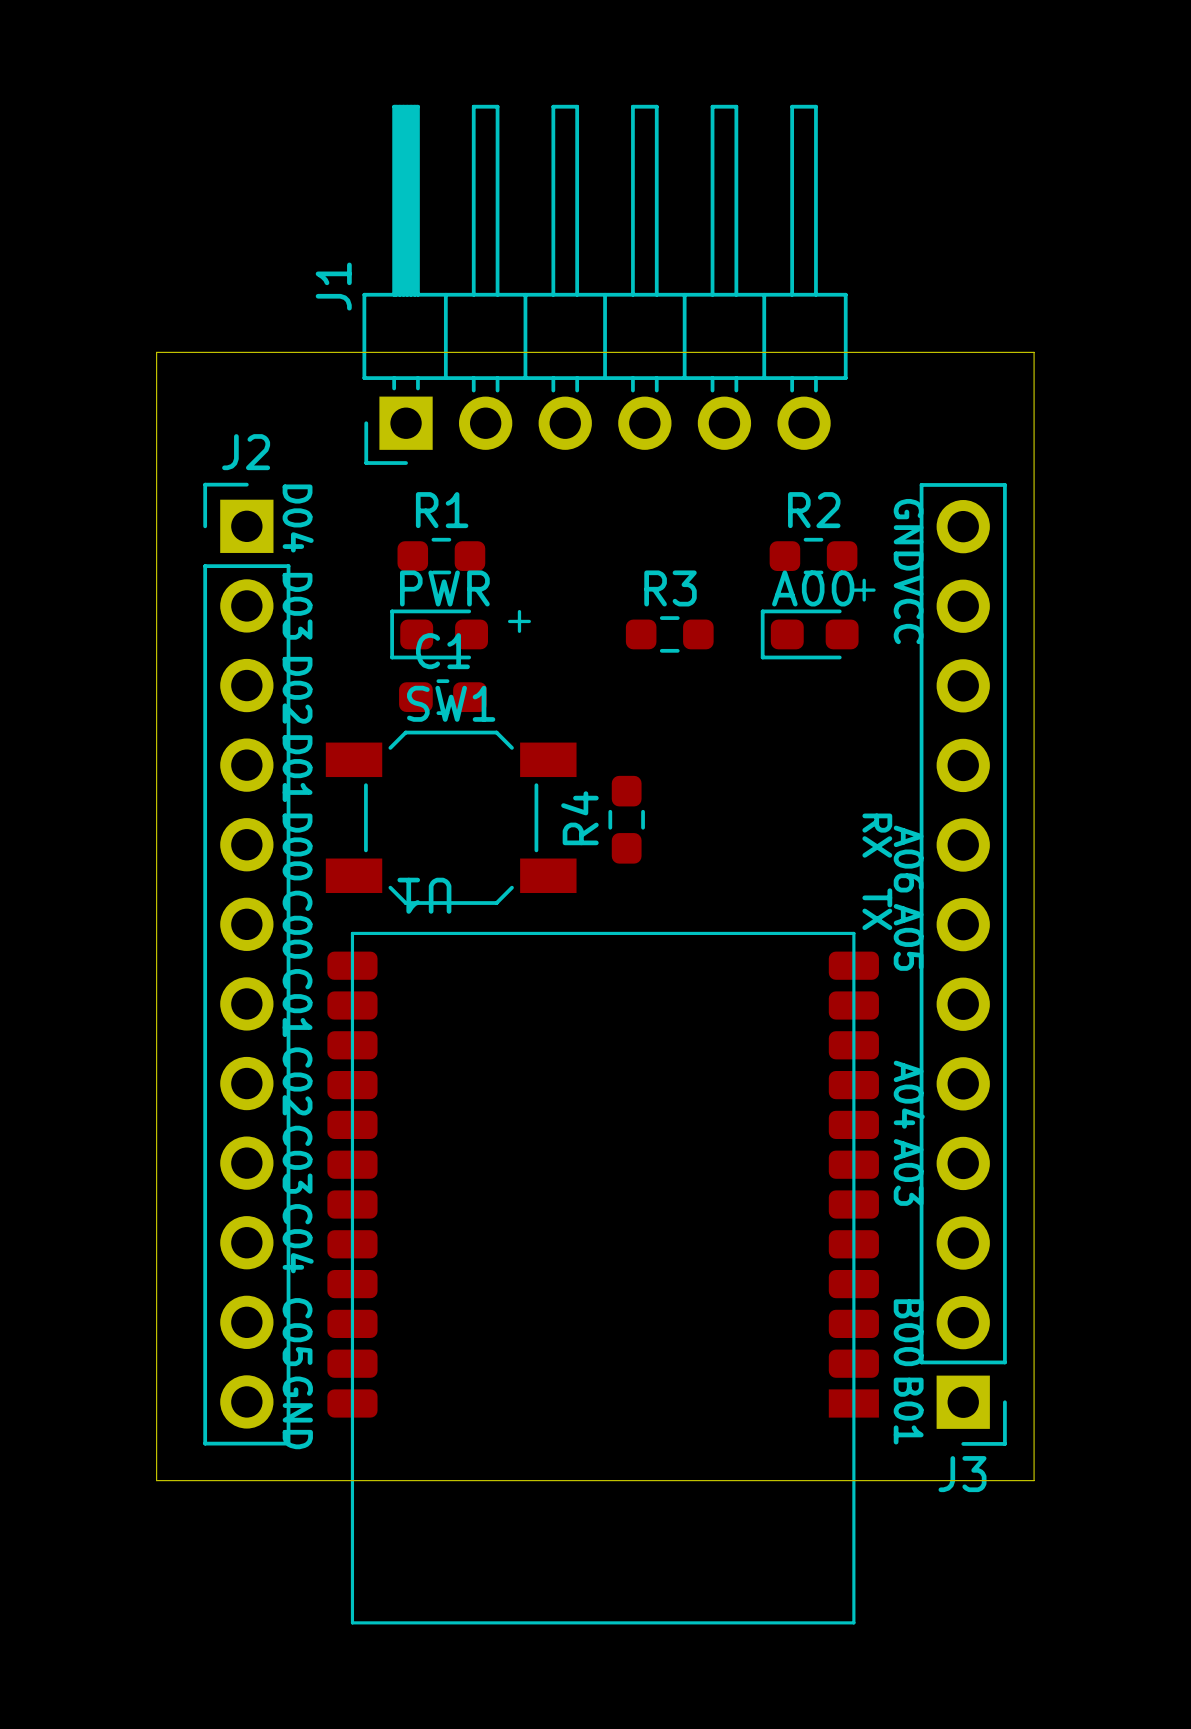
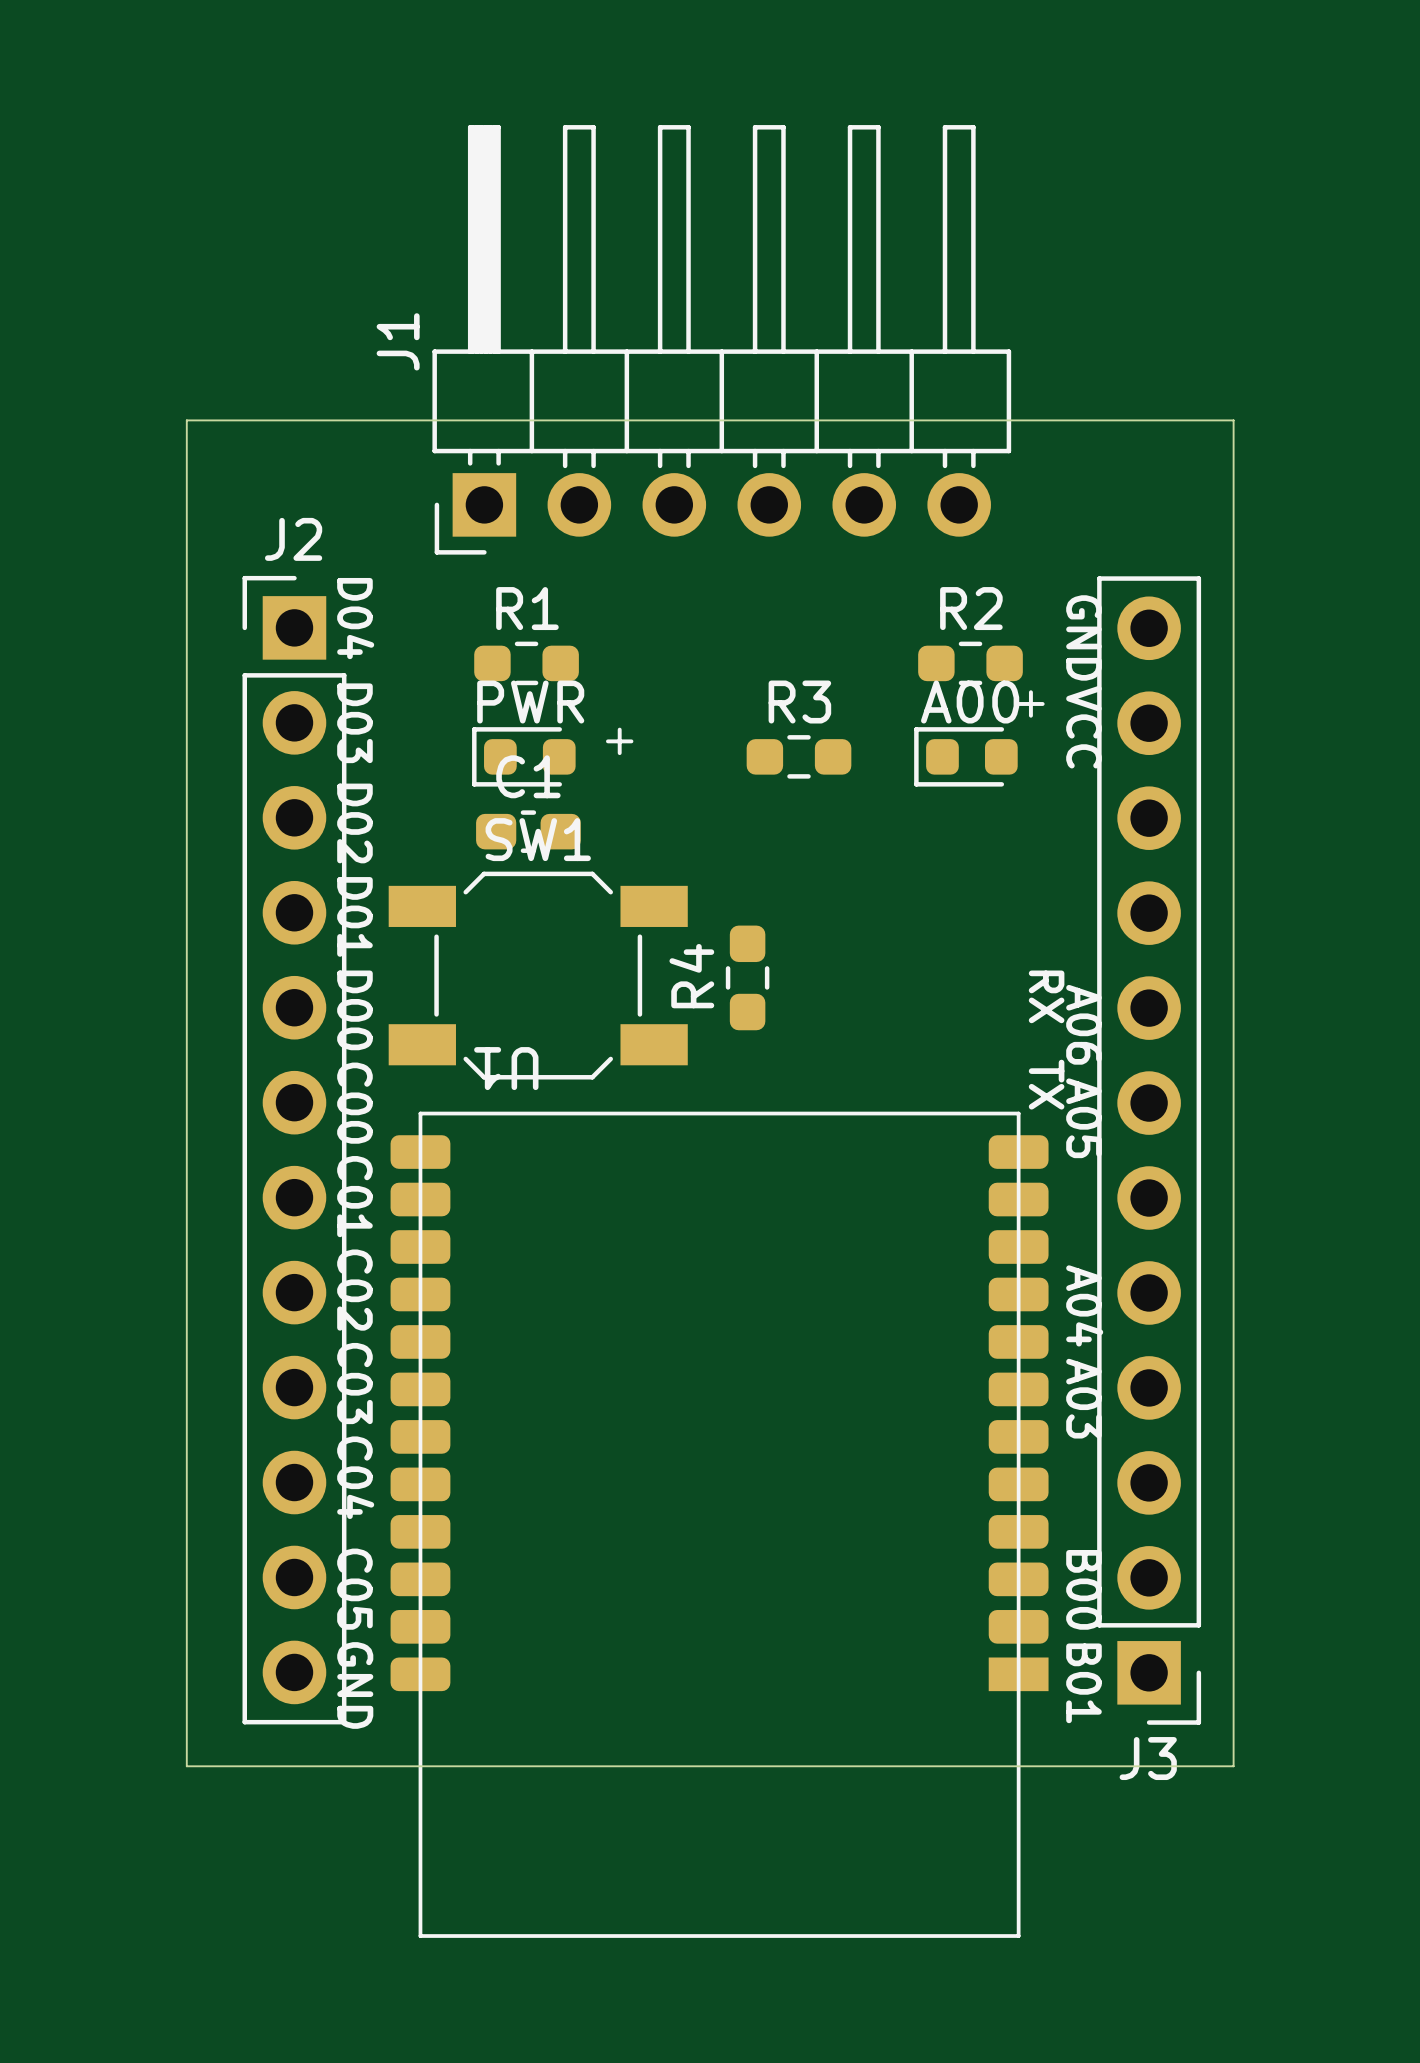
PWR footprint: [390, 609, 489, 660] -> [472, 727, 576, 787]
A00 footprint: [760, 609, 859, 660] -> [914, 727, 1018, 787]

